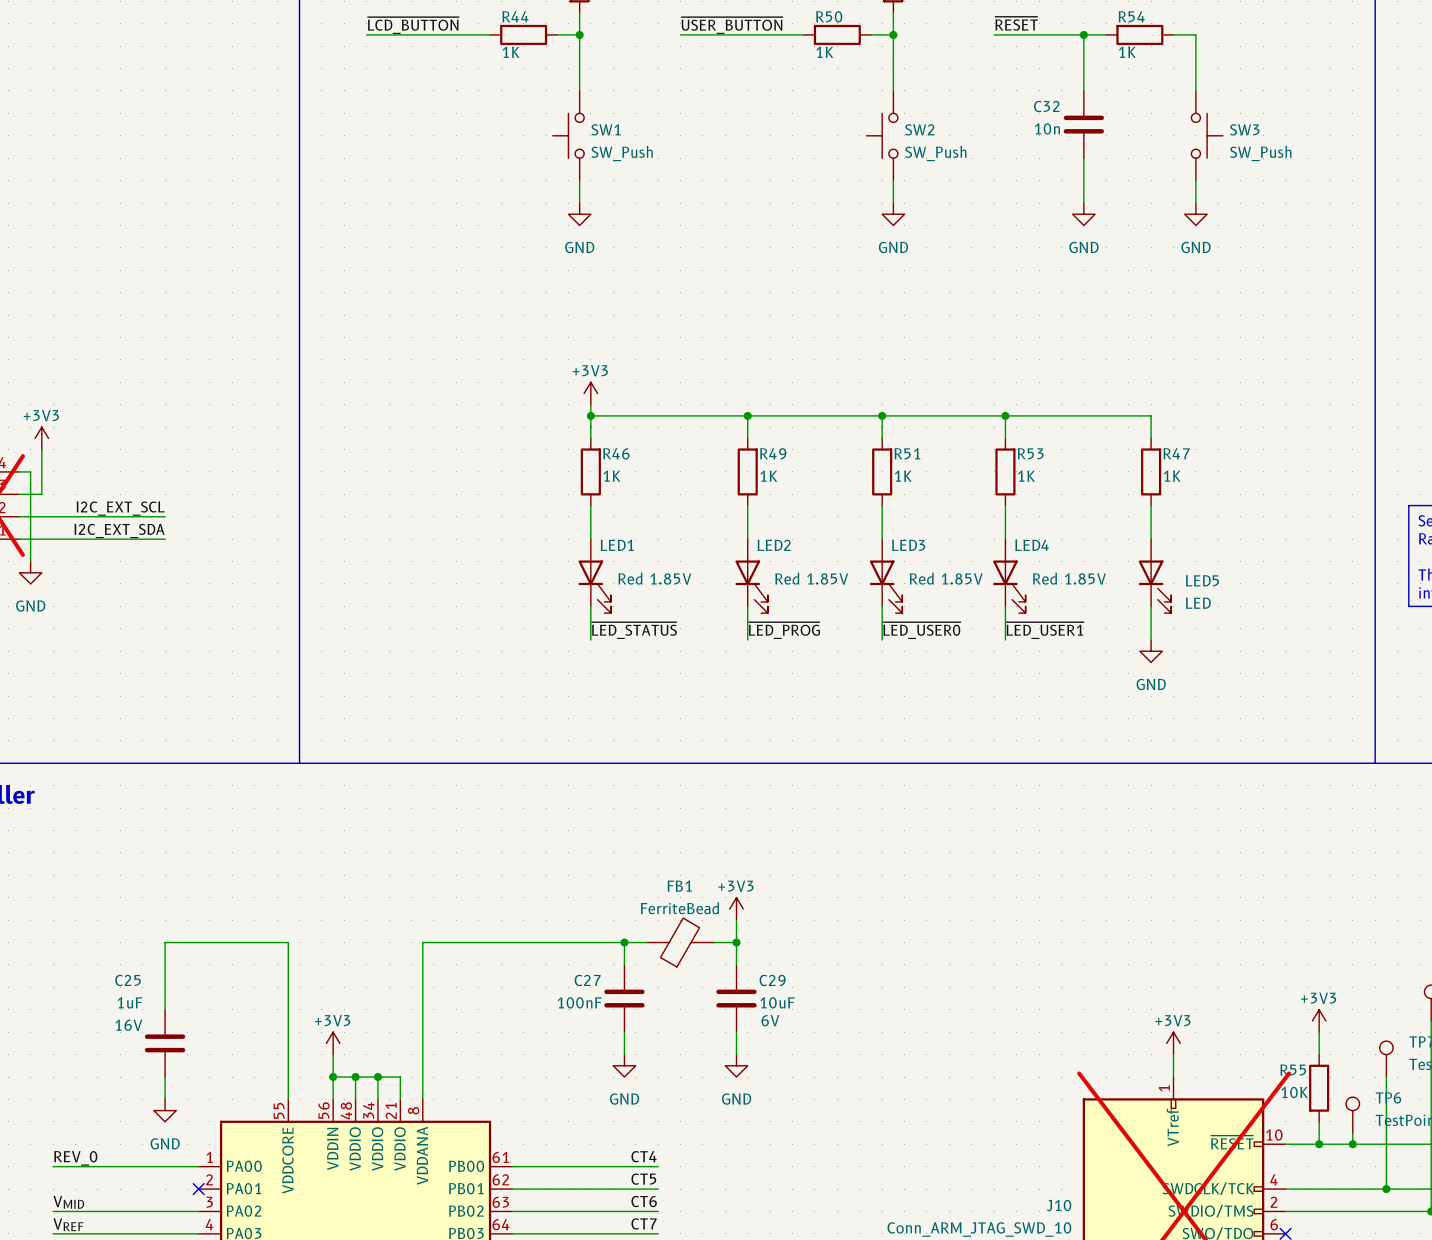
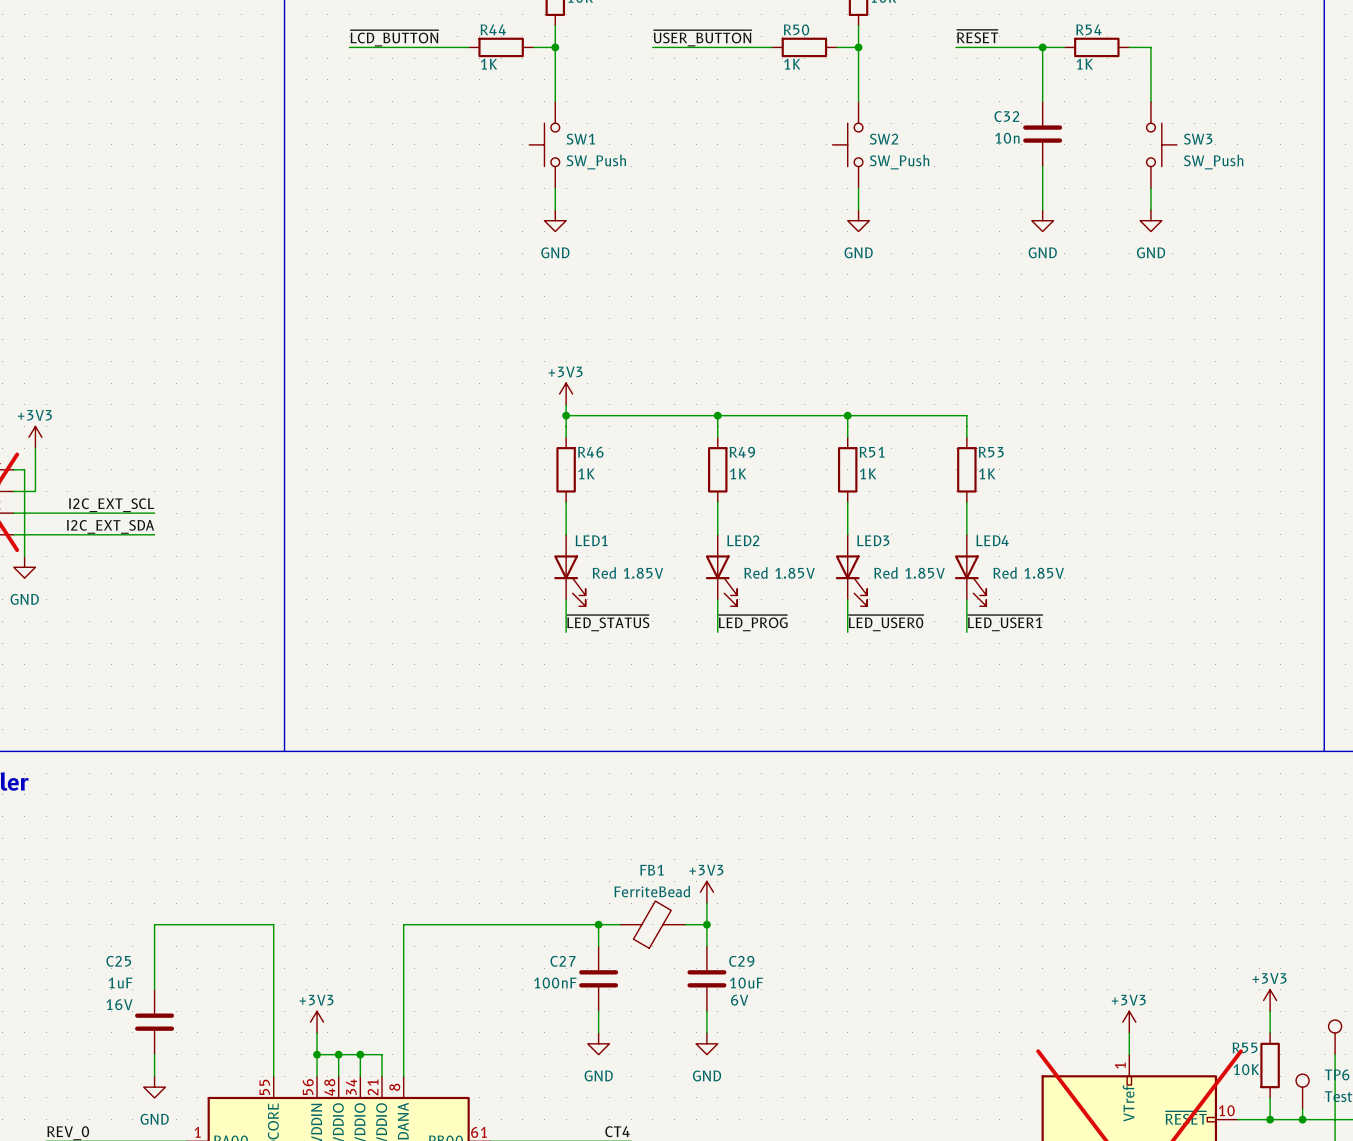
wire: (1005, 415) (1151, 415) (1151, 438) -> none
junction: (1005, 415) -> none
R47: 1K (1151, 471) -> none
wire: (1151, 505) (1151, 539) -> none
LED5: LED (1155, 576) -> none
wire: (1151, 606) (1151, 640) -> none
power symbol: GND (1151, 651) -> none

